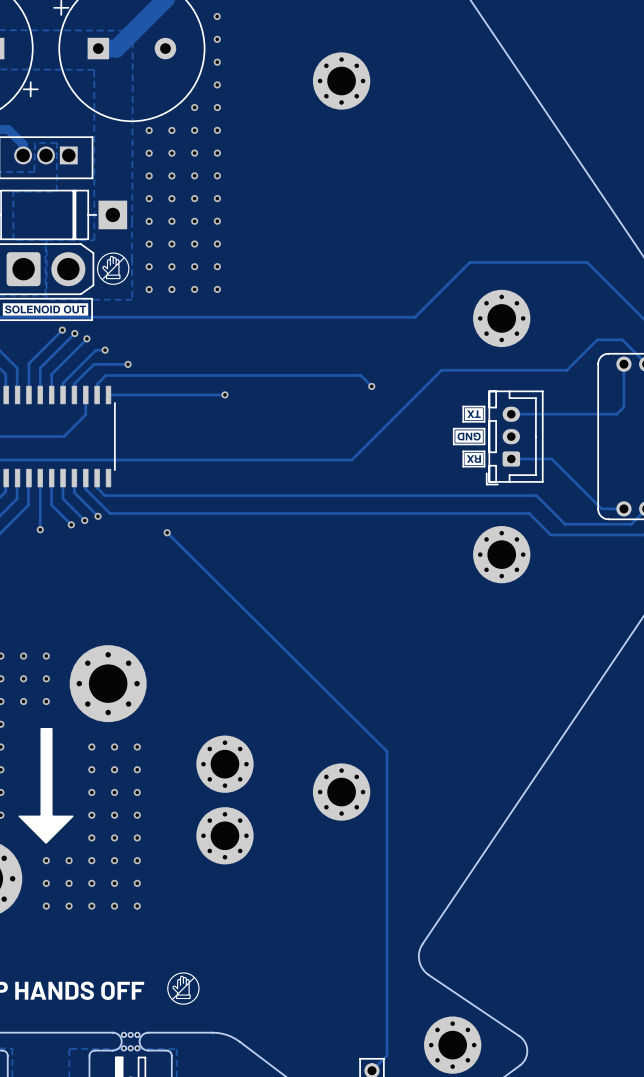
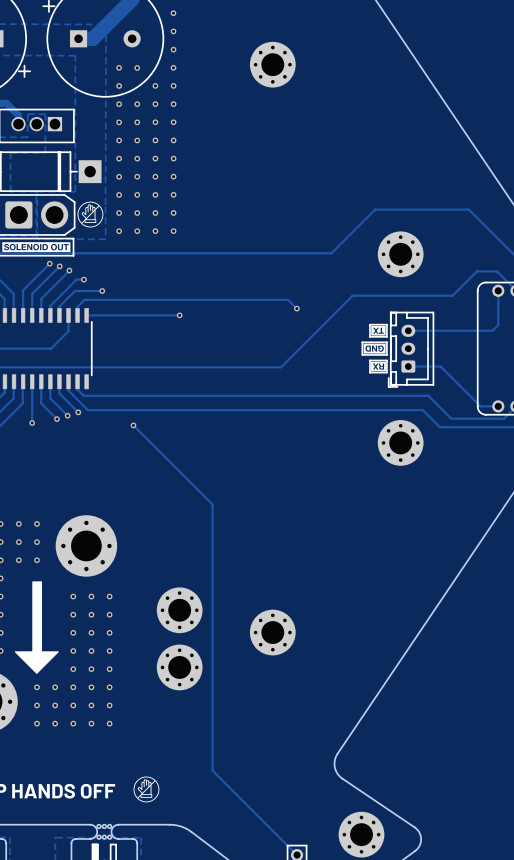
via: none -> (119, 67)
via: none -> (137, 67)
via: none -> (119, 85)
track: (167, 532) (387, 751) (387, 1055) (371, 1070) -> (133, 425) (212, 504) (212, 770) (297, 855)

